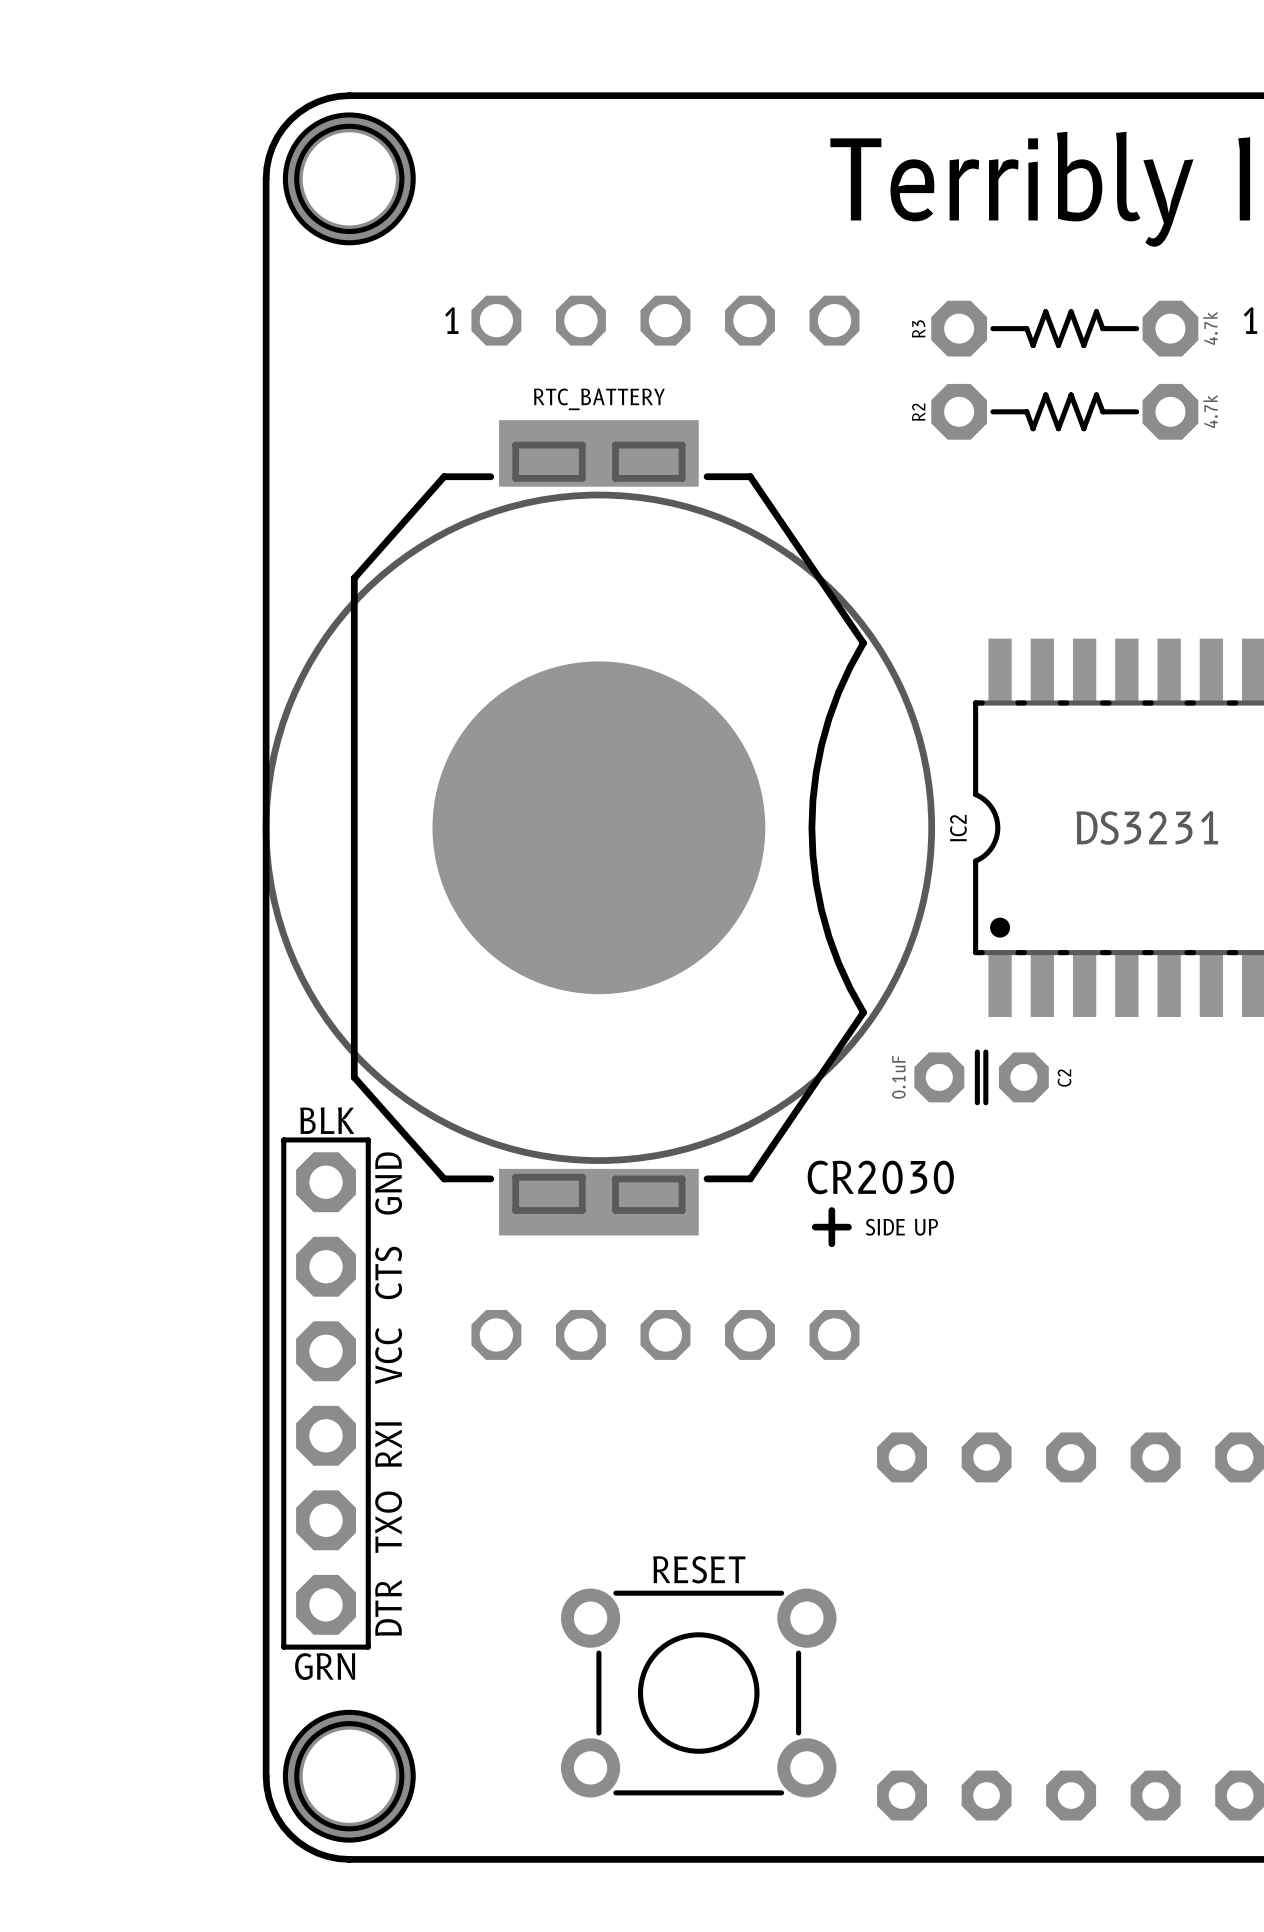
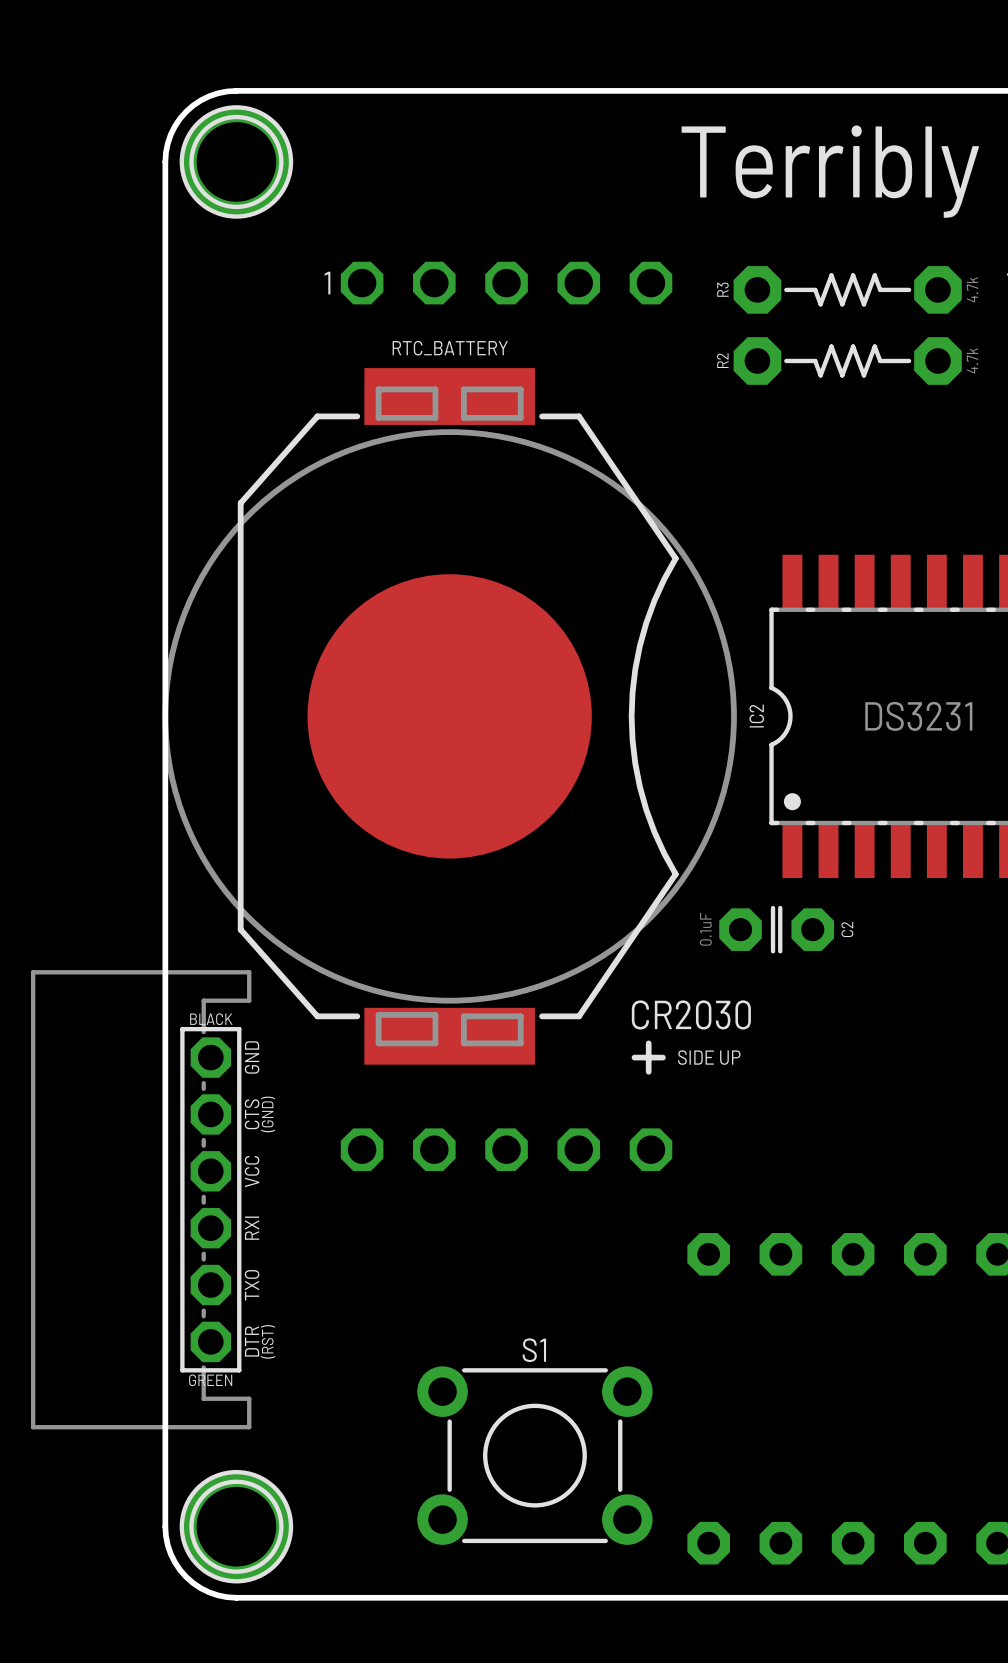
part: none -> (141, 1199)
part: (326, 1393) -> none
RESET name: RESET (699, 1569) -> S1 (534, 1350)

